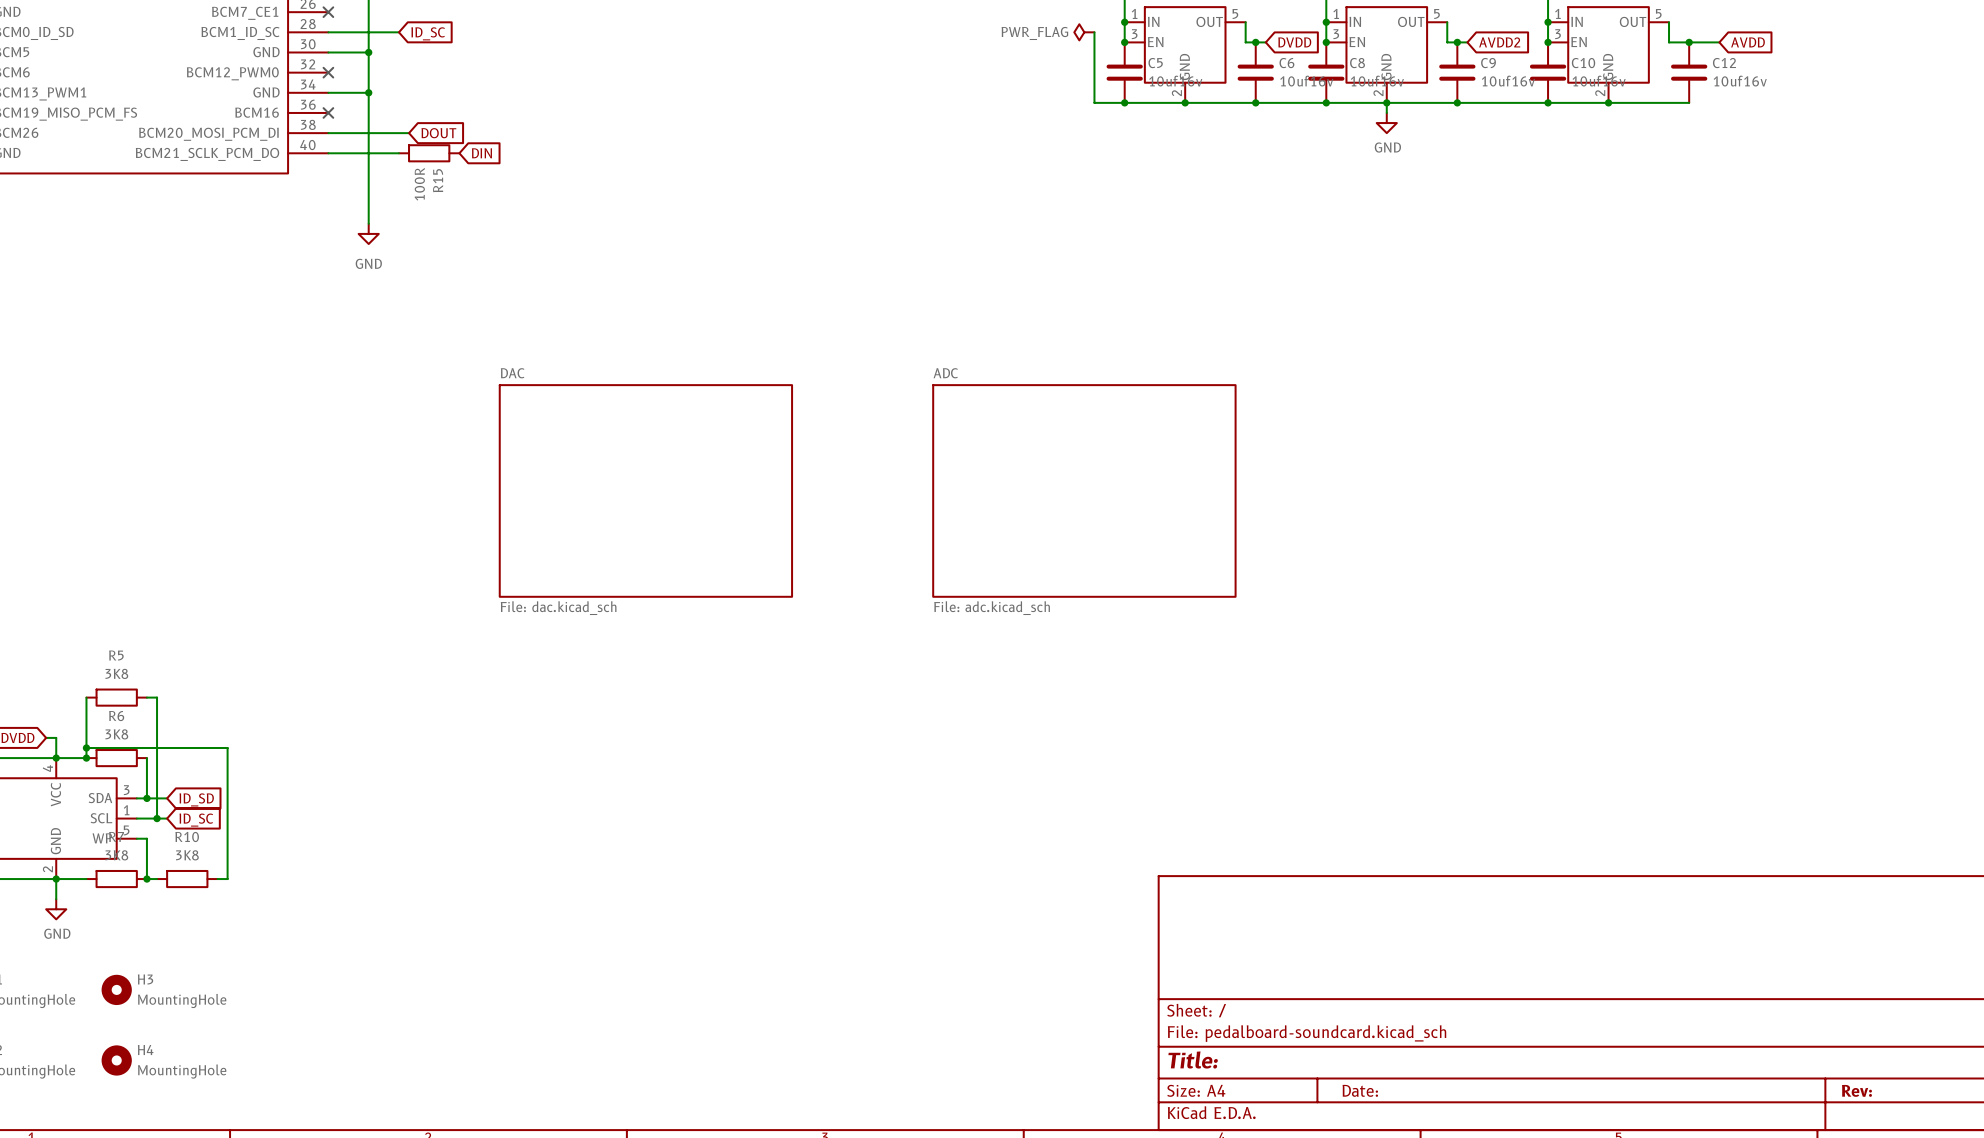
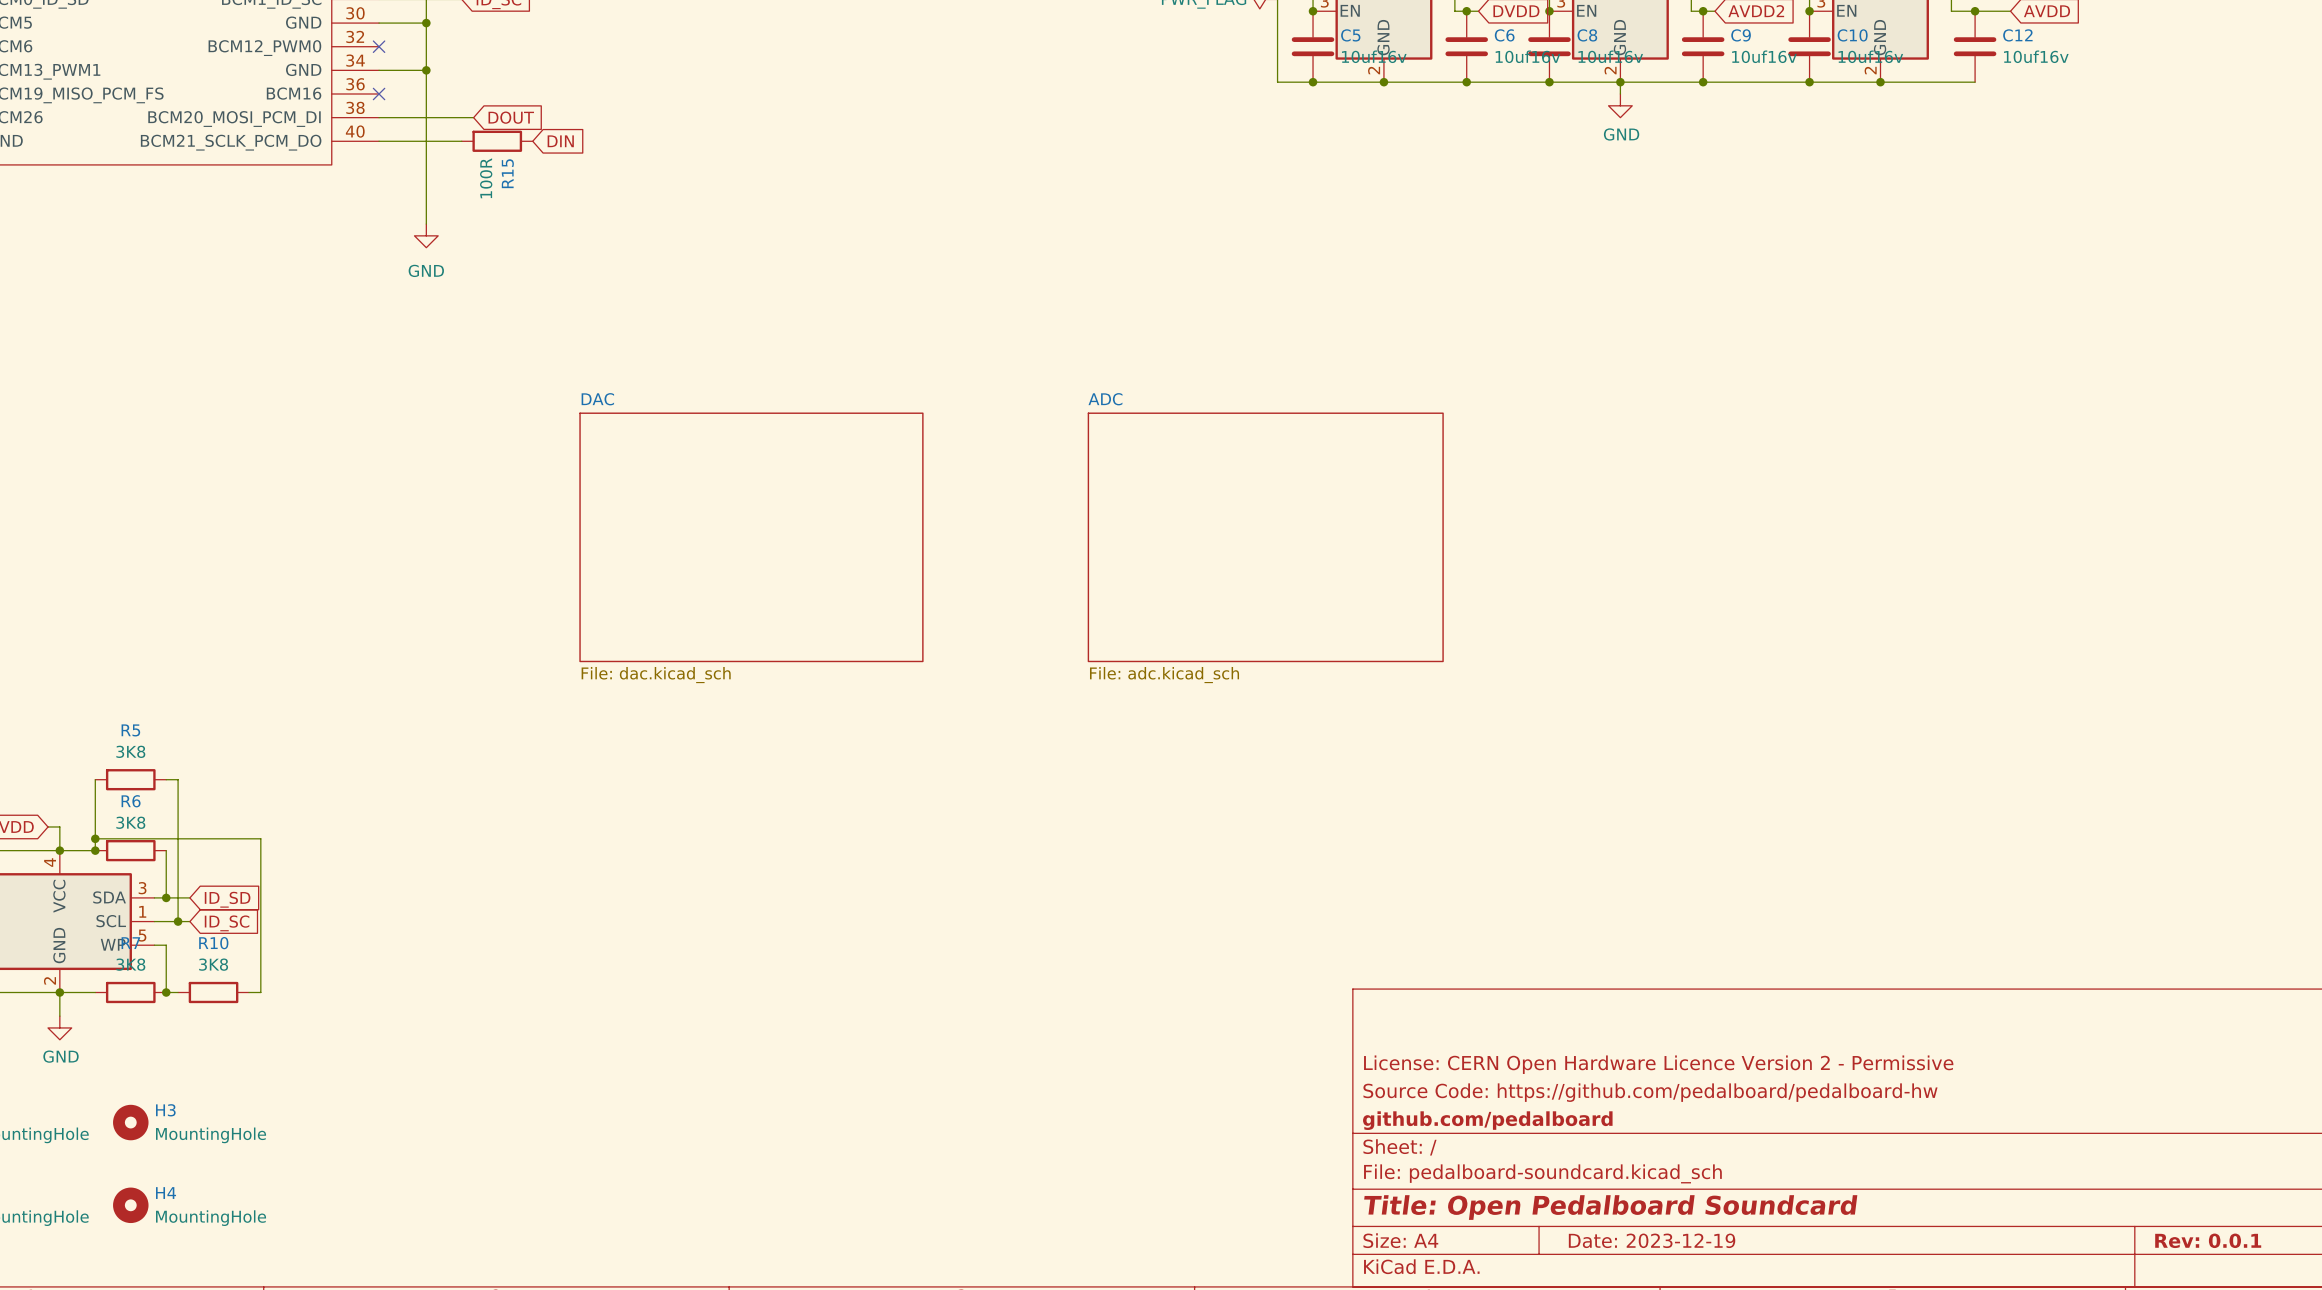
title block: none -> License: CERN Open Hardware Licence Version 2 - Permissive (1658, 1064)
title block: none -> Source Code: https://github.com/pedalboard/pedalboard-hw (1650, 1092)
title block: none -> github.com/pedalboard (1487, 1120)
title block: Title: (1193, 1059) -> Title: Open Pedalboard Soundcard (1610, 1207)
title block: Date: (1360, 1090) -> Date: 2023-12-19 (1652, 1240)
title block: Rev: (1856, 1090) -> Rev: 0.0.1 (2208, 1240)

